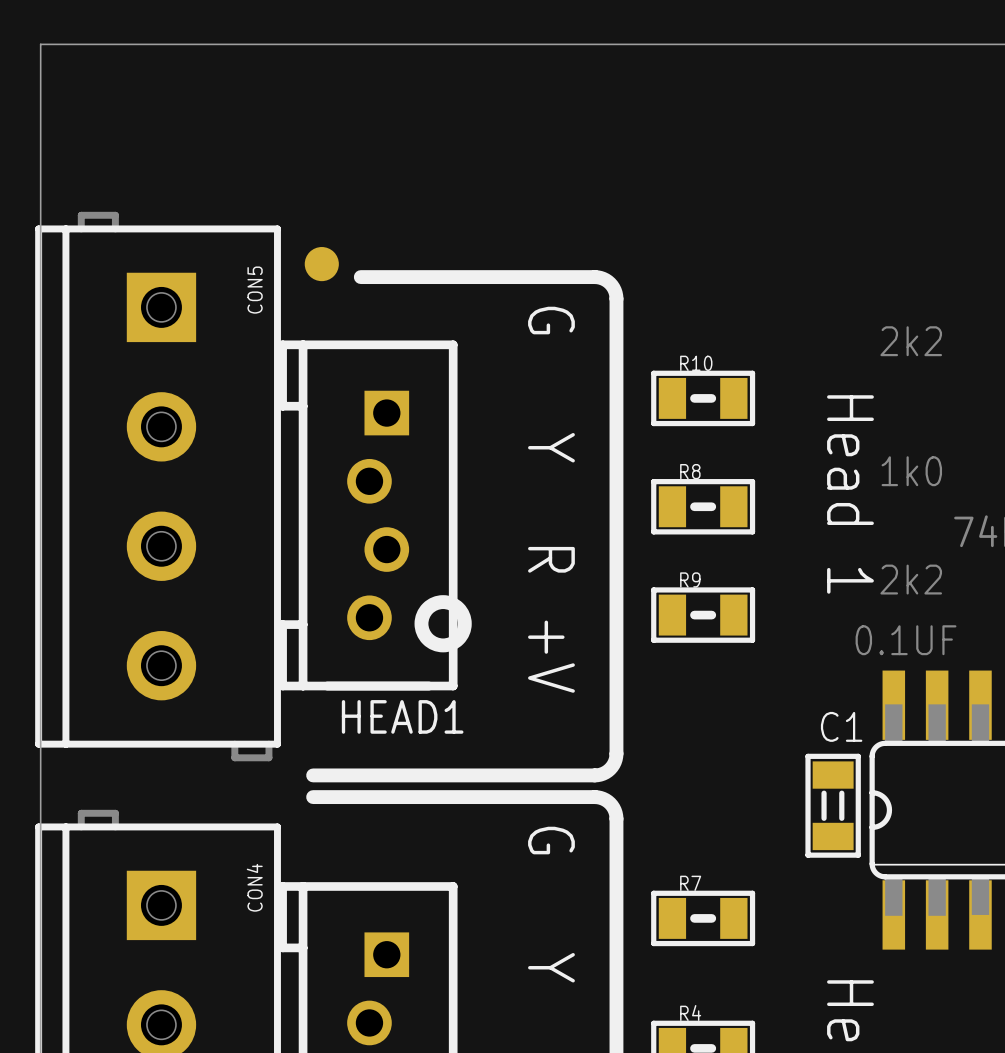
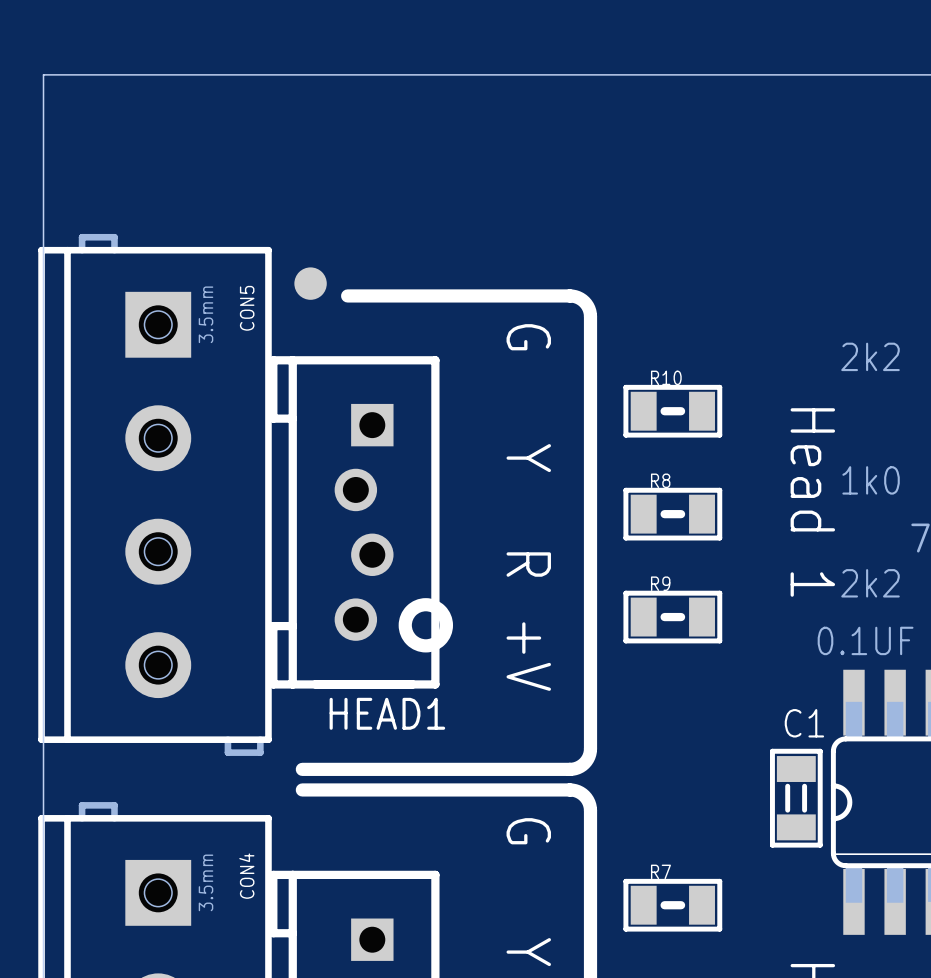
CON5 value: none -> 3.5mm (206, 314)
CON4 value: none -> 3.5mm (206, 882)

